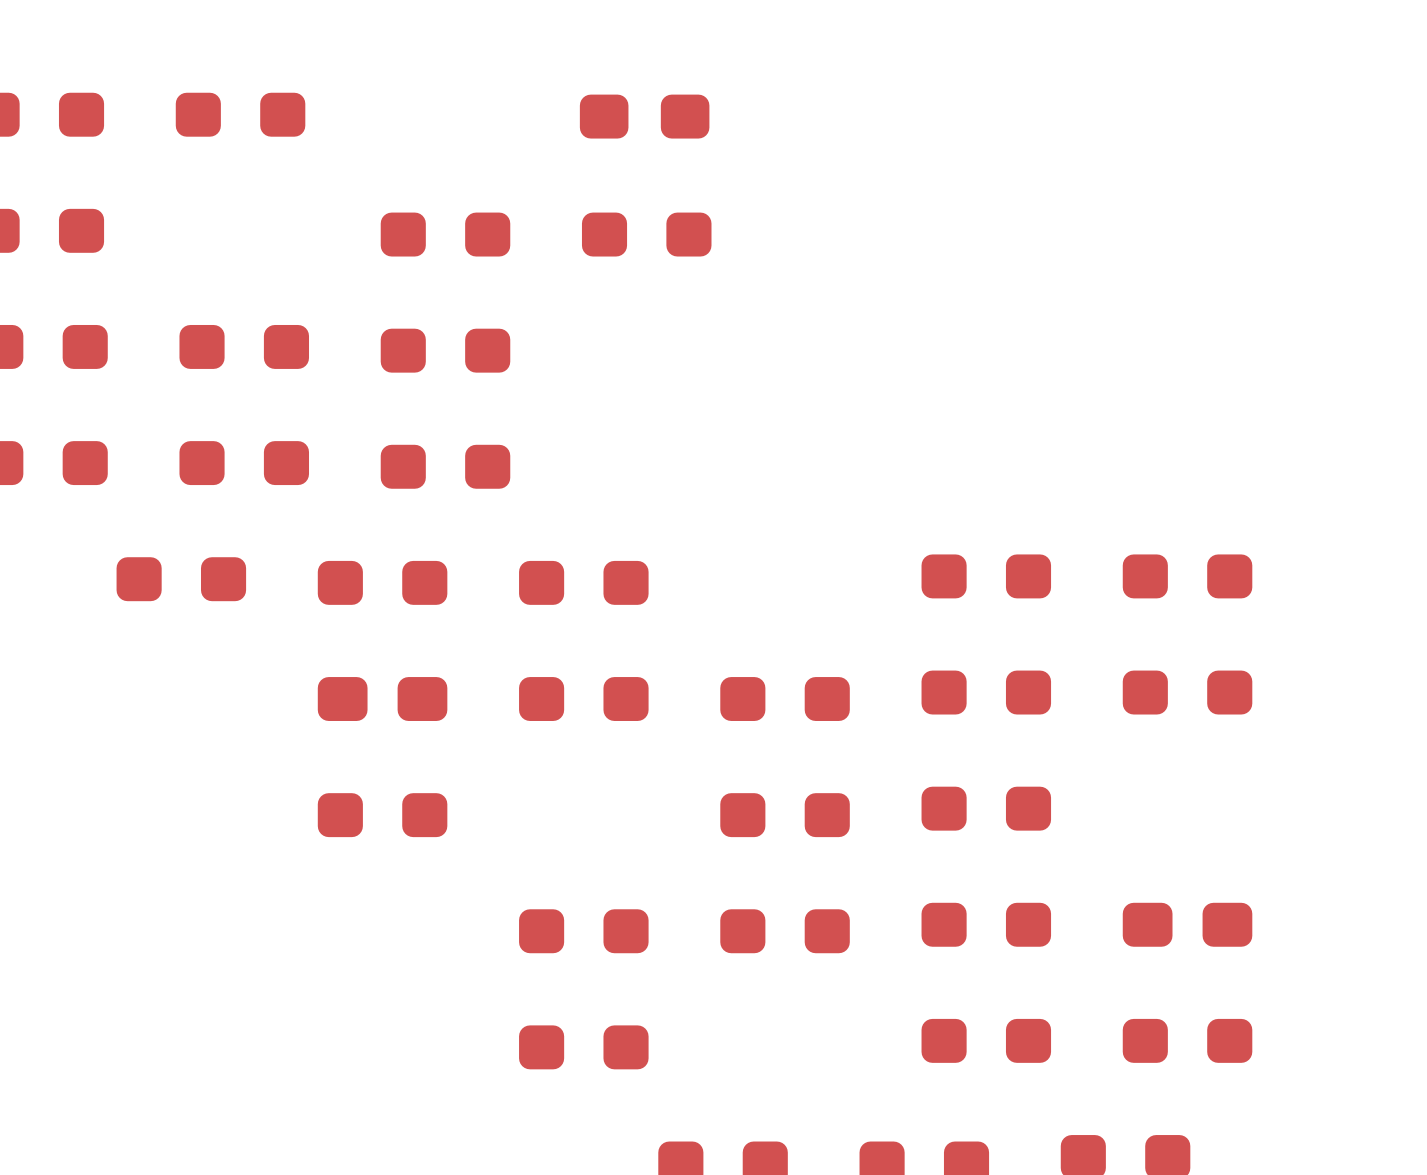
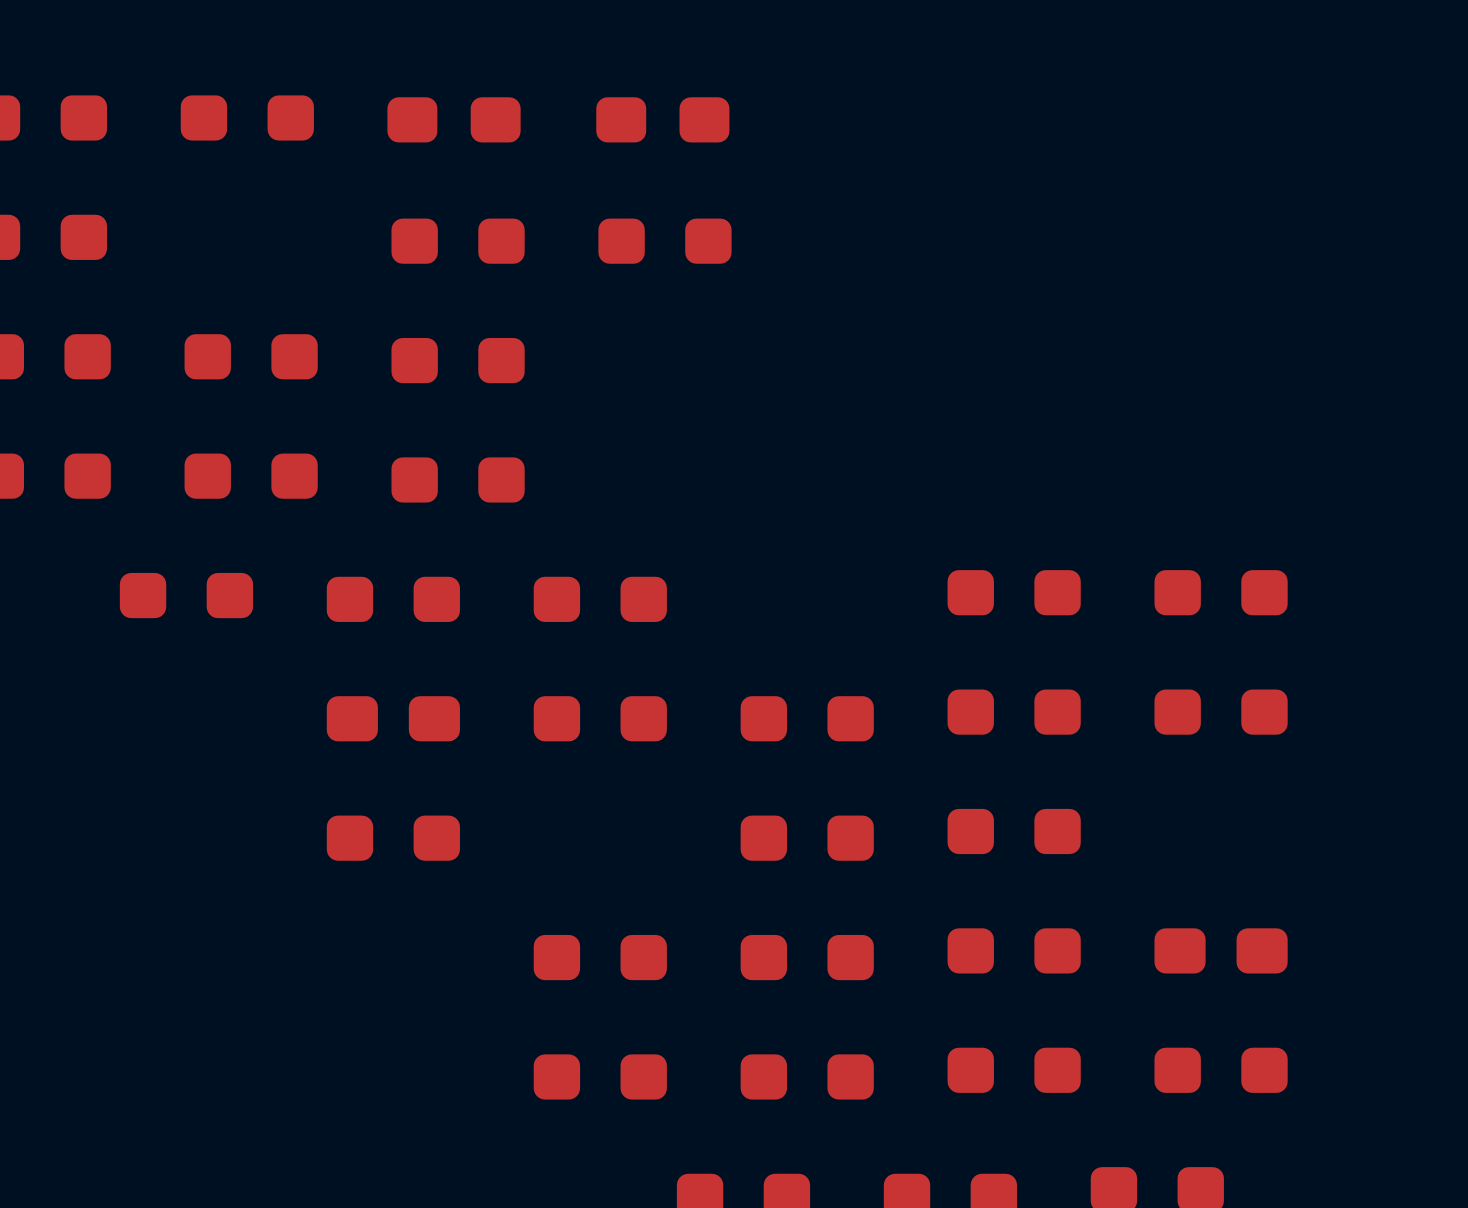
part: none -> (454, 119)
part: none -> (807, 1076)

